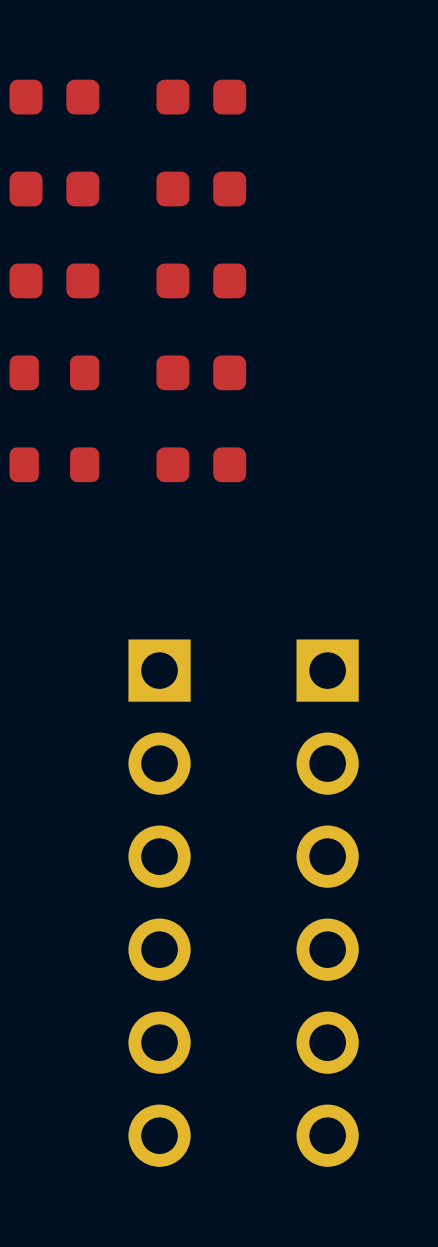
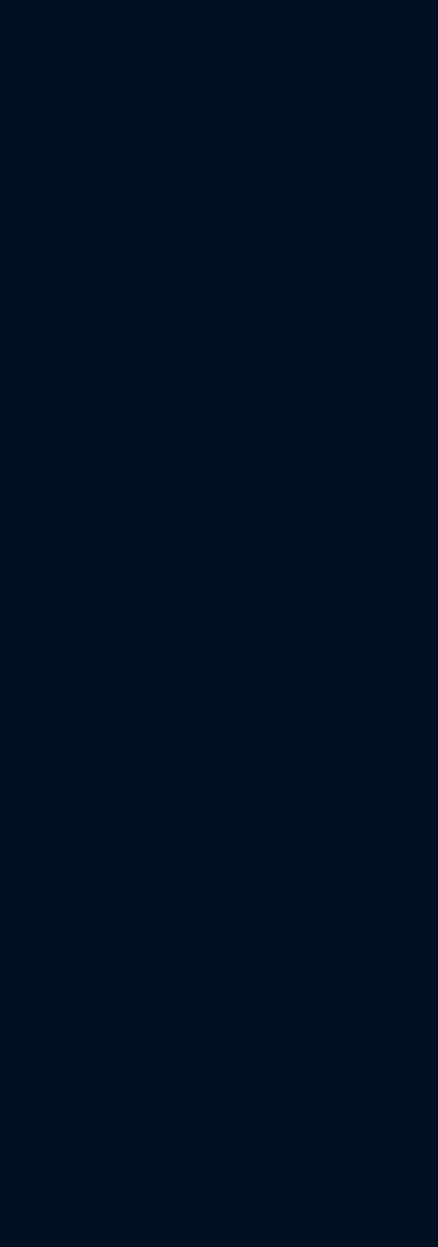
part: (54, 97) -> none
part: (201, 97) -> none
part: (54, 189) -> none
part: (201, 189) -> none
part: (54, 280) -> none
part: (201, 280) -> none
part: (54, 372) -> none
part: (201, 372) -> none
part: (54, 464) -> none
part: (201, 464) -> none
part: (159, 903) -> none
part: (327, 903) -> none

